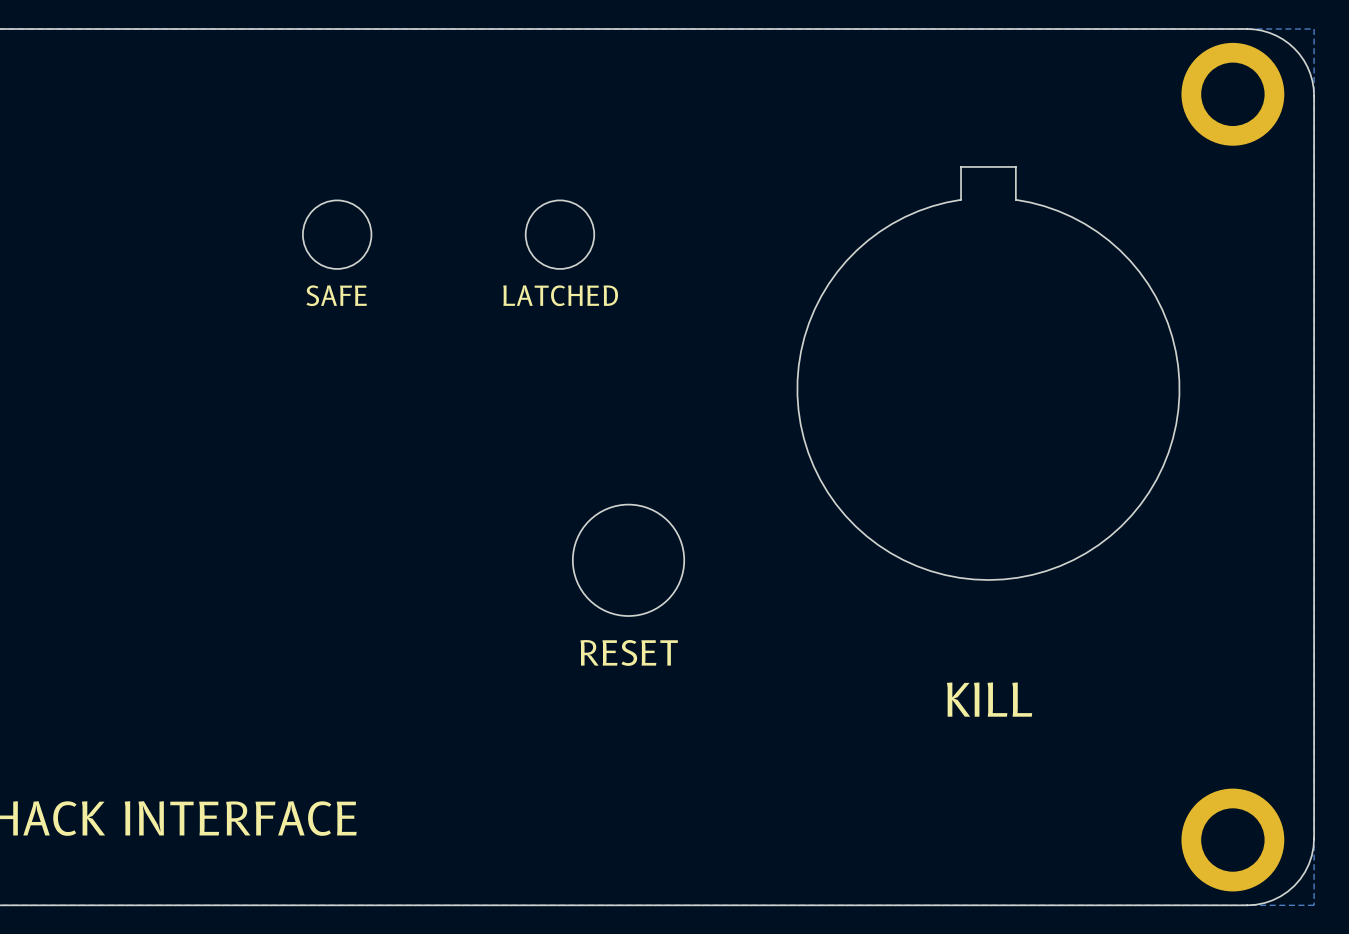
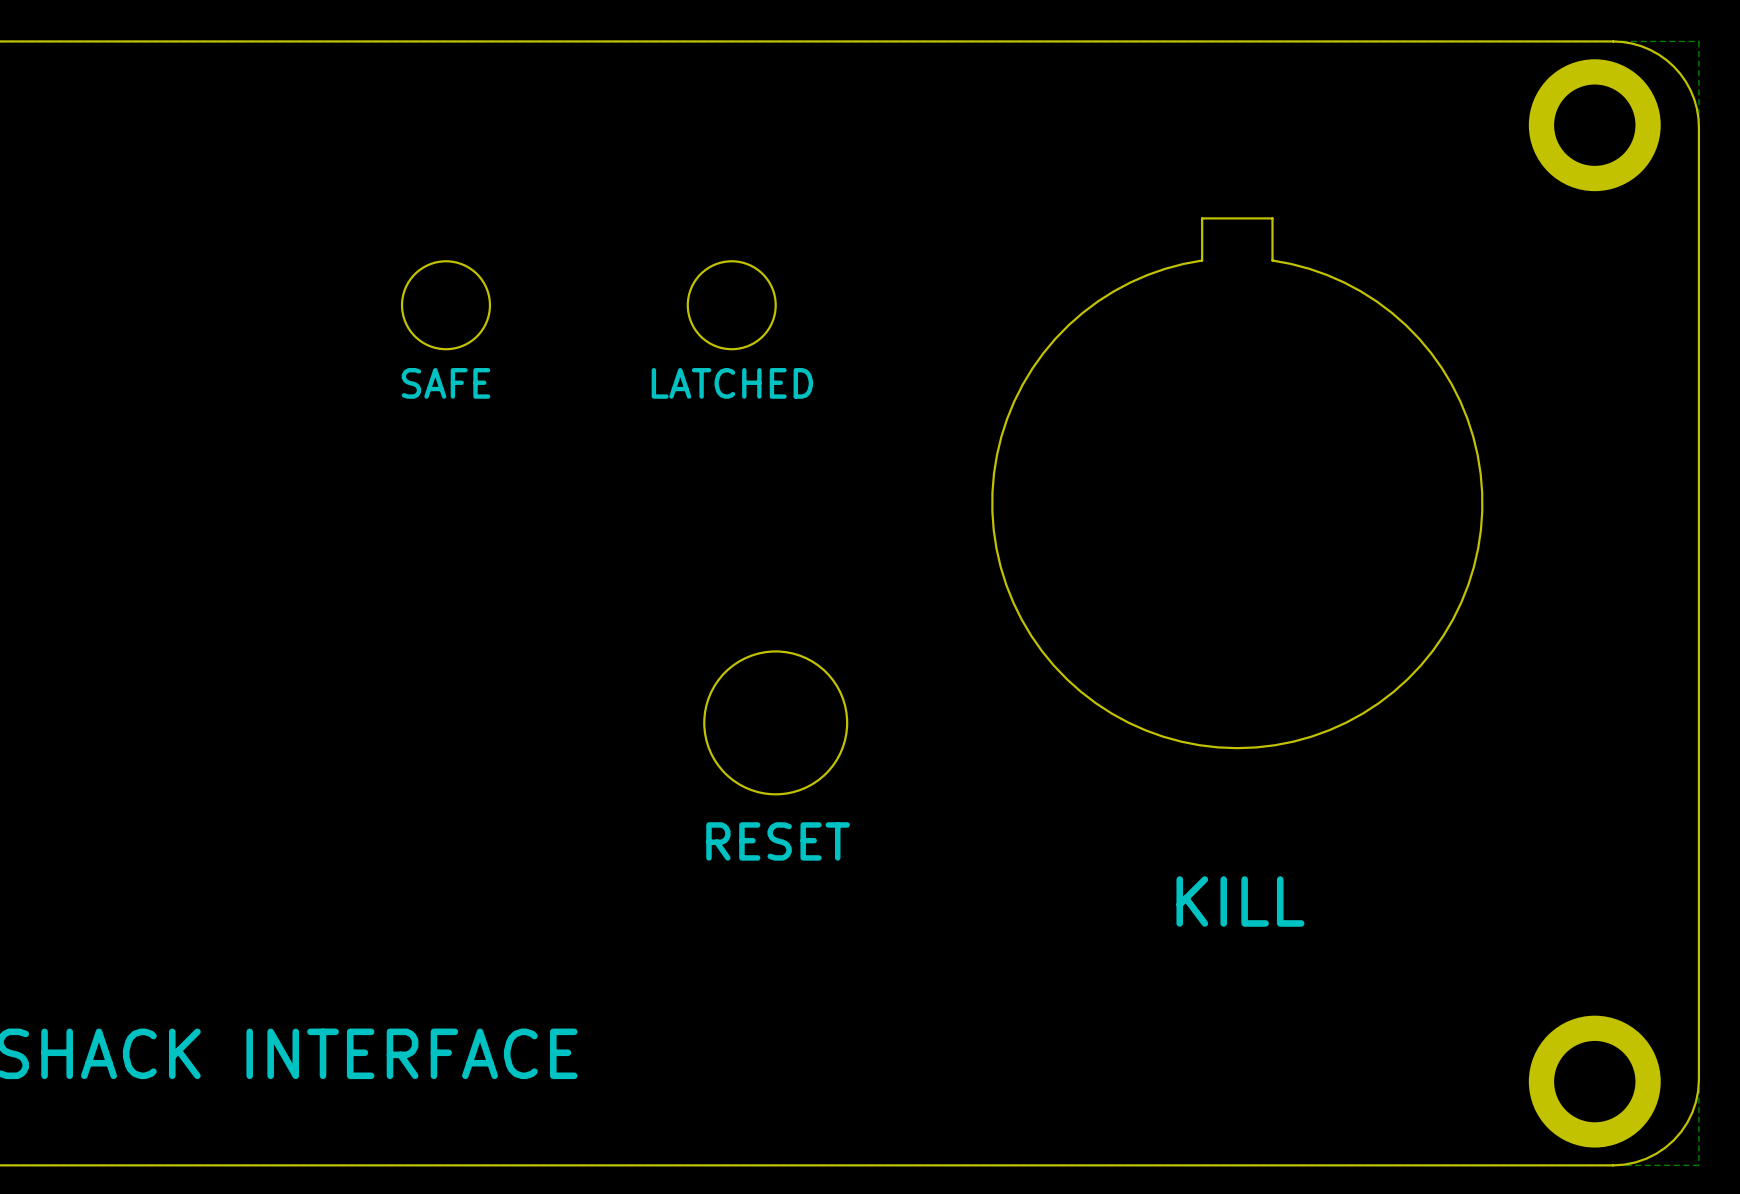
board edge: (961, 166) (961, 199) (932, 206) (892, 223) (867, 240) (837, 272) (821, 296) (808, 323) (801, 351) (797, 395) (803, 438) (813, 466) (827, 492) (855, 526) (890, 553) (916, 566) (959, 577) (988, 580) (1017, 577) (1060, 566) (1098, 545) (1121, 526) (1140, 504) (1163, 466) (1176, 424) (1179, 380) (1175, 351) (1167, 323) (1148, 283) (1130, 260) (1097, 231) (1071, 216) (1044, 206) (1015, 199) (1015, 166) (981, 166) -> (1246, 218) (1202, 218) (1202, 260) (1165, 268) (1130, 282) (1082, 312) (1055, 338) (1022, 384) (1007, 418) (996, 455) (992, 492) (996, 548) (1006, 585) (1031, 635) (1053, 665) (1080, 691) (1128, 722) (1181, 741) (1237, 748) (1293, 741) (1329, 730) (1378, 703) (1407, 679) (1443, 635) (1461, 602) (1478, 548) (1482, 511) (1480, 473) (1473, 436) (1451, 384) (1431, 353) (1405, 325) (1360, 291) (1309, 268) (1272, 260) (1272, 218)
round board edge position: (628, 560) -> (775, 722)
text position: RESET (629, 652) -> RESET (778, 841)
text position: KILL (989, 699) -> KILL (1240, 901)

